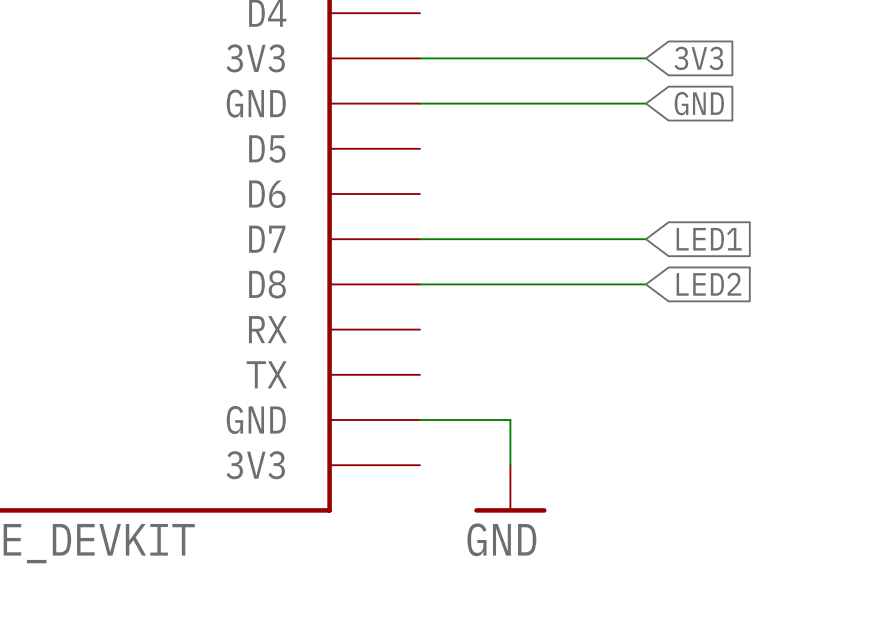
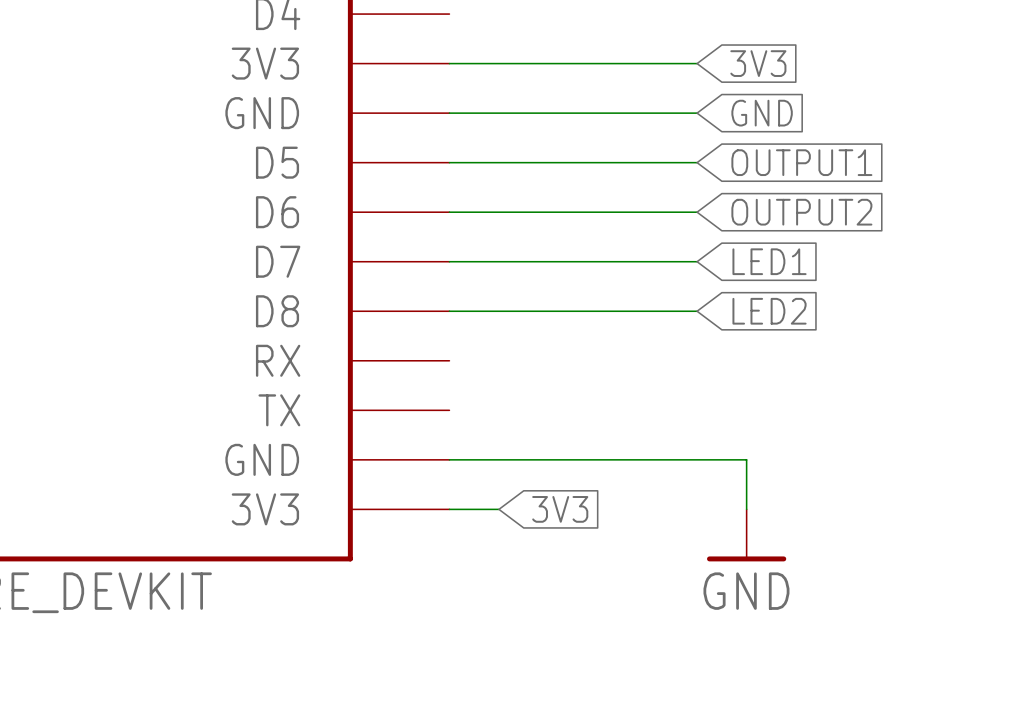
wire: none -> (449, 162) (697, 162)
global label: none -> OUTPUT1 (801, 162)
wire: none -> (449, 212) (697, 212)
global label: none -> OUTPUT2 (801, 212)
wire: (510, 420) (510, 465) -> (548, 459) (746, 459) (746, 509)
wire: none -> (449, 509) (498, 509)
global label: none -> 3V3 (560, 509)
power symbol position: GND (510, 488) -> GND (746, 535)

